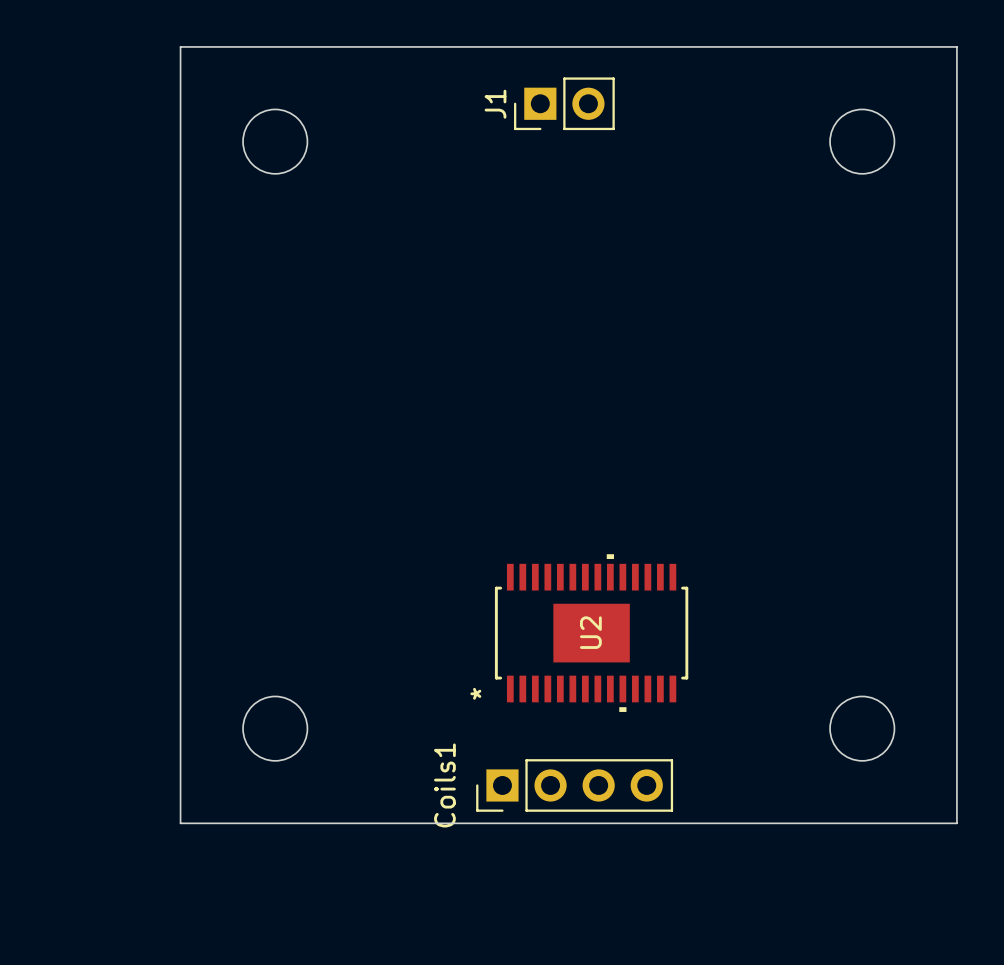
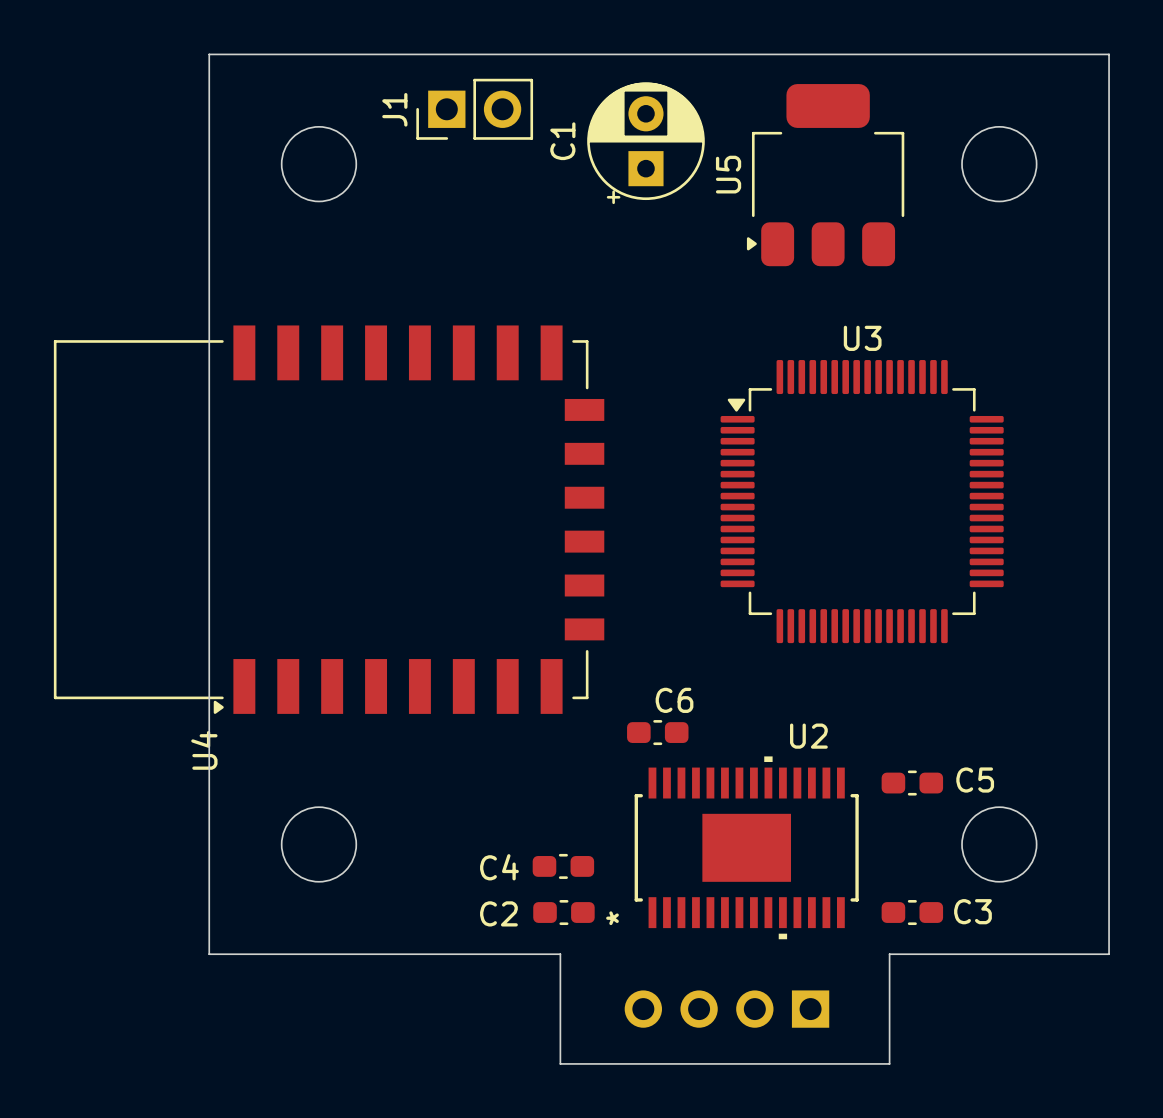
J1 position: (564, 103) -> (474, 109)
C1: none -> (645, 143)
U5: none -> (825, 175)
U3: none -> (862, 501)
U4: none -> (329, 519)
C6: none -> (657, 732)
U2 name rotation: 0° (590, 632) -> 90° clockwise (808, 736)
U2 name position: U2 (590, 632) -> U2 (808, 736)
U2 position: (591, 633) -> (746, 847)
C5: none -> (912, 783)
C4: none -> (563, 866)
Coils1: (574, 785) -> none
C2: none -> (563, 912)
C3: none -> (912, 912)
board edge: (483, 823) (767, 823) -> (560, 954) (560, 1063) (889, 1063) (889, 954)
part: none -> (726, 1009)

